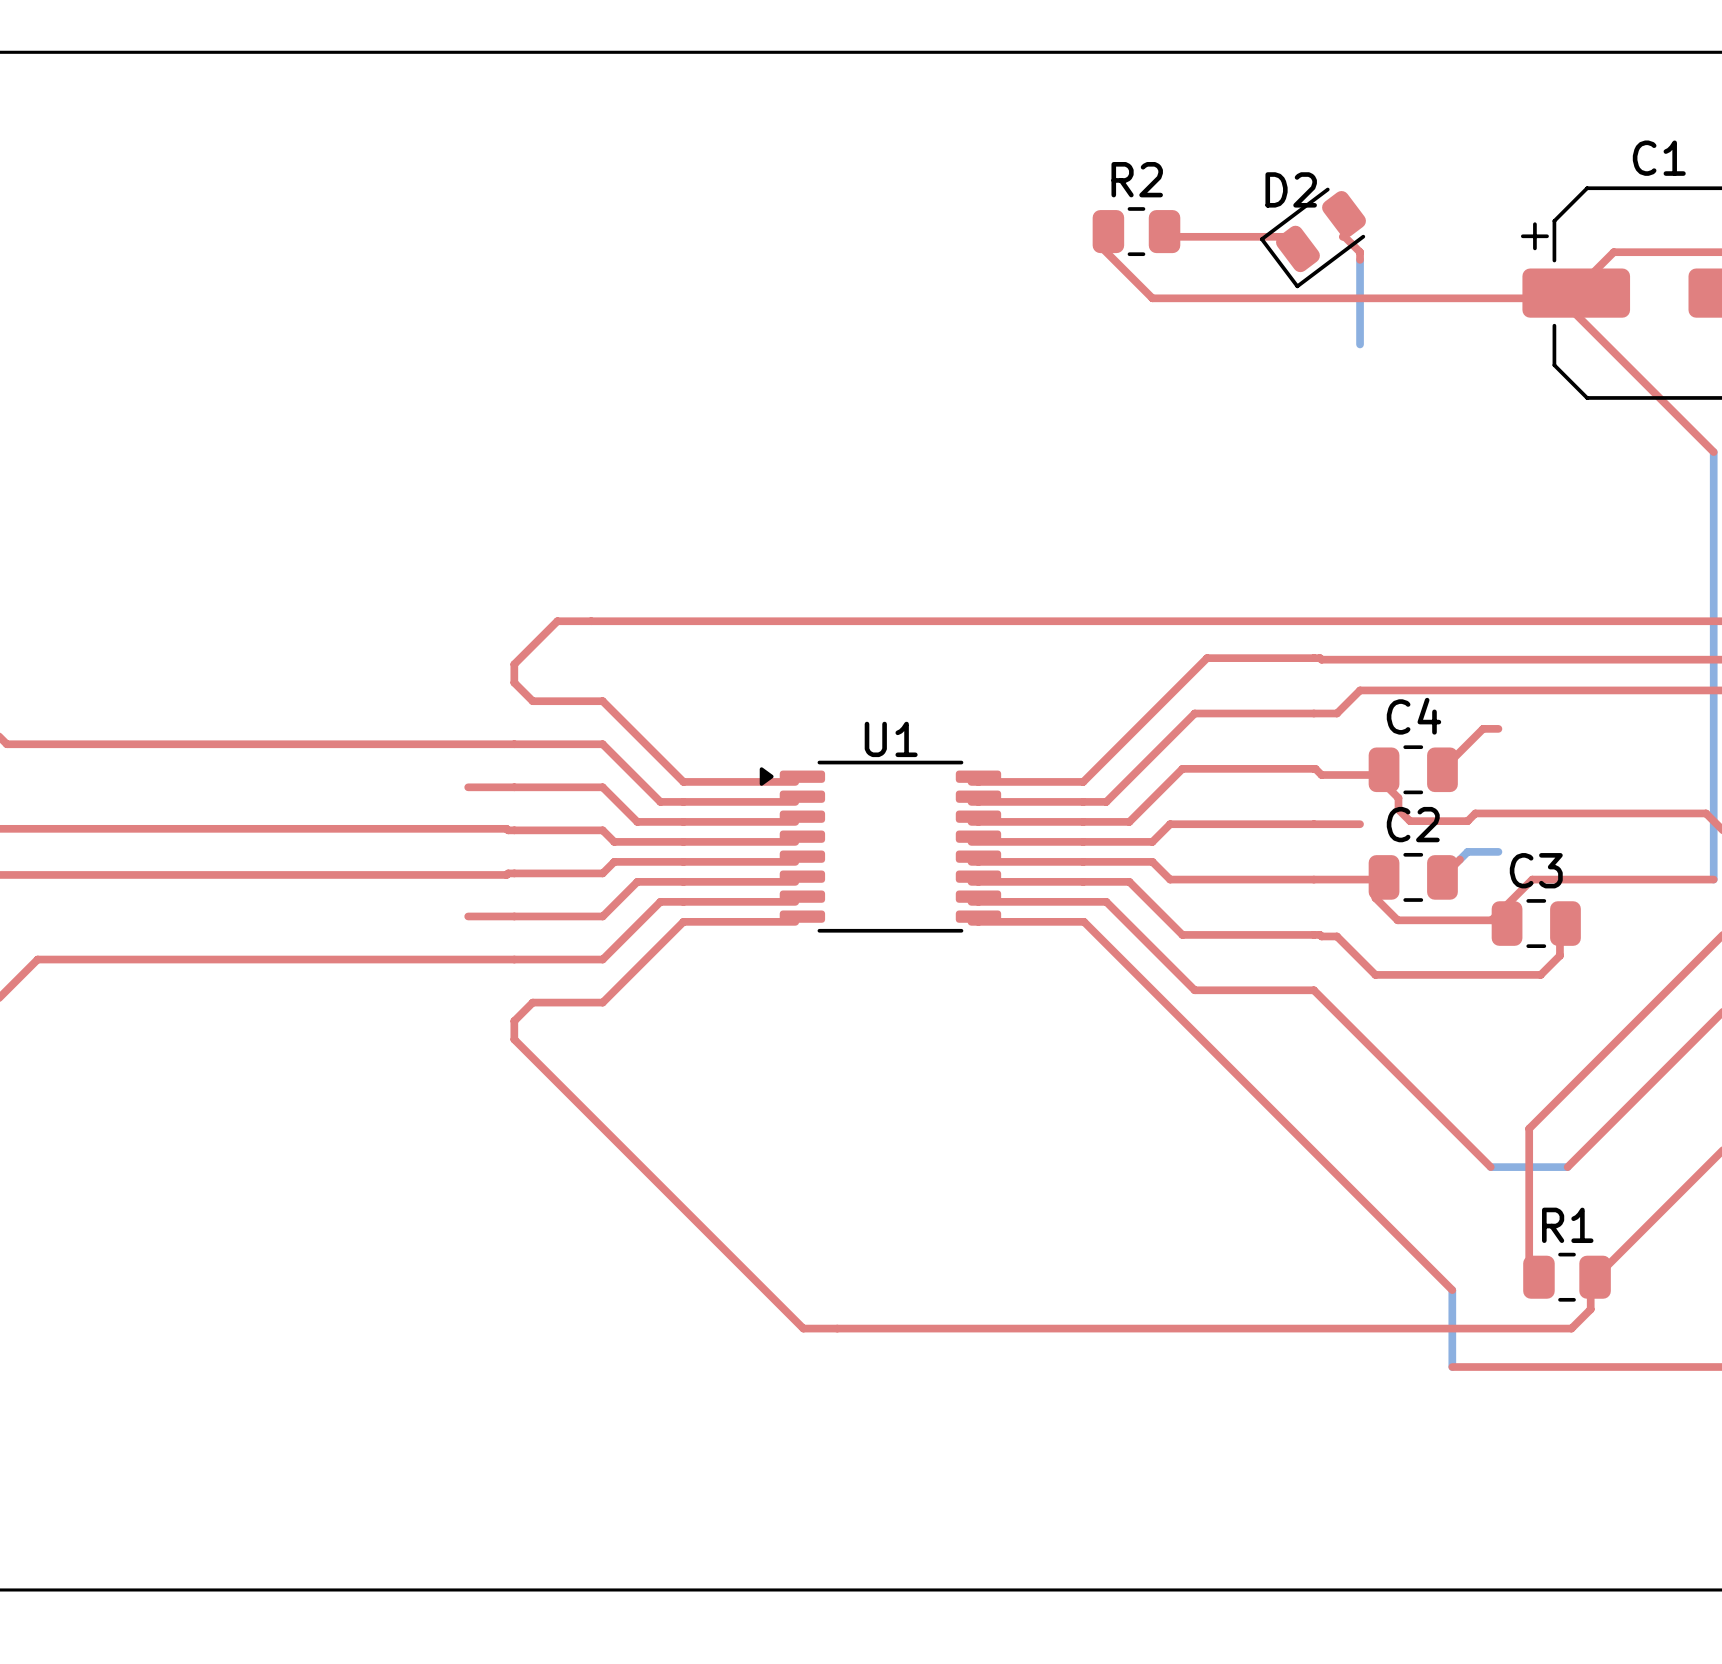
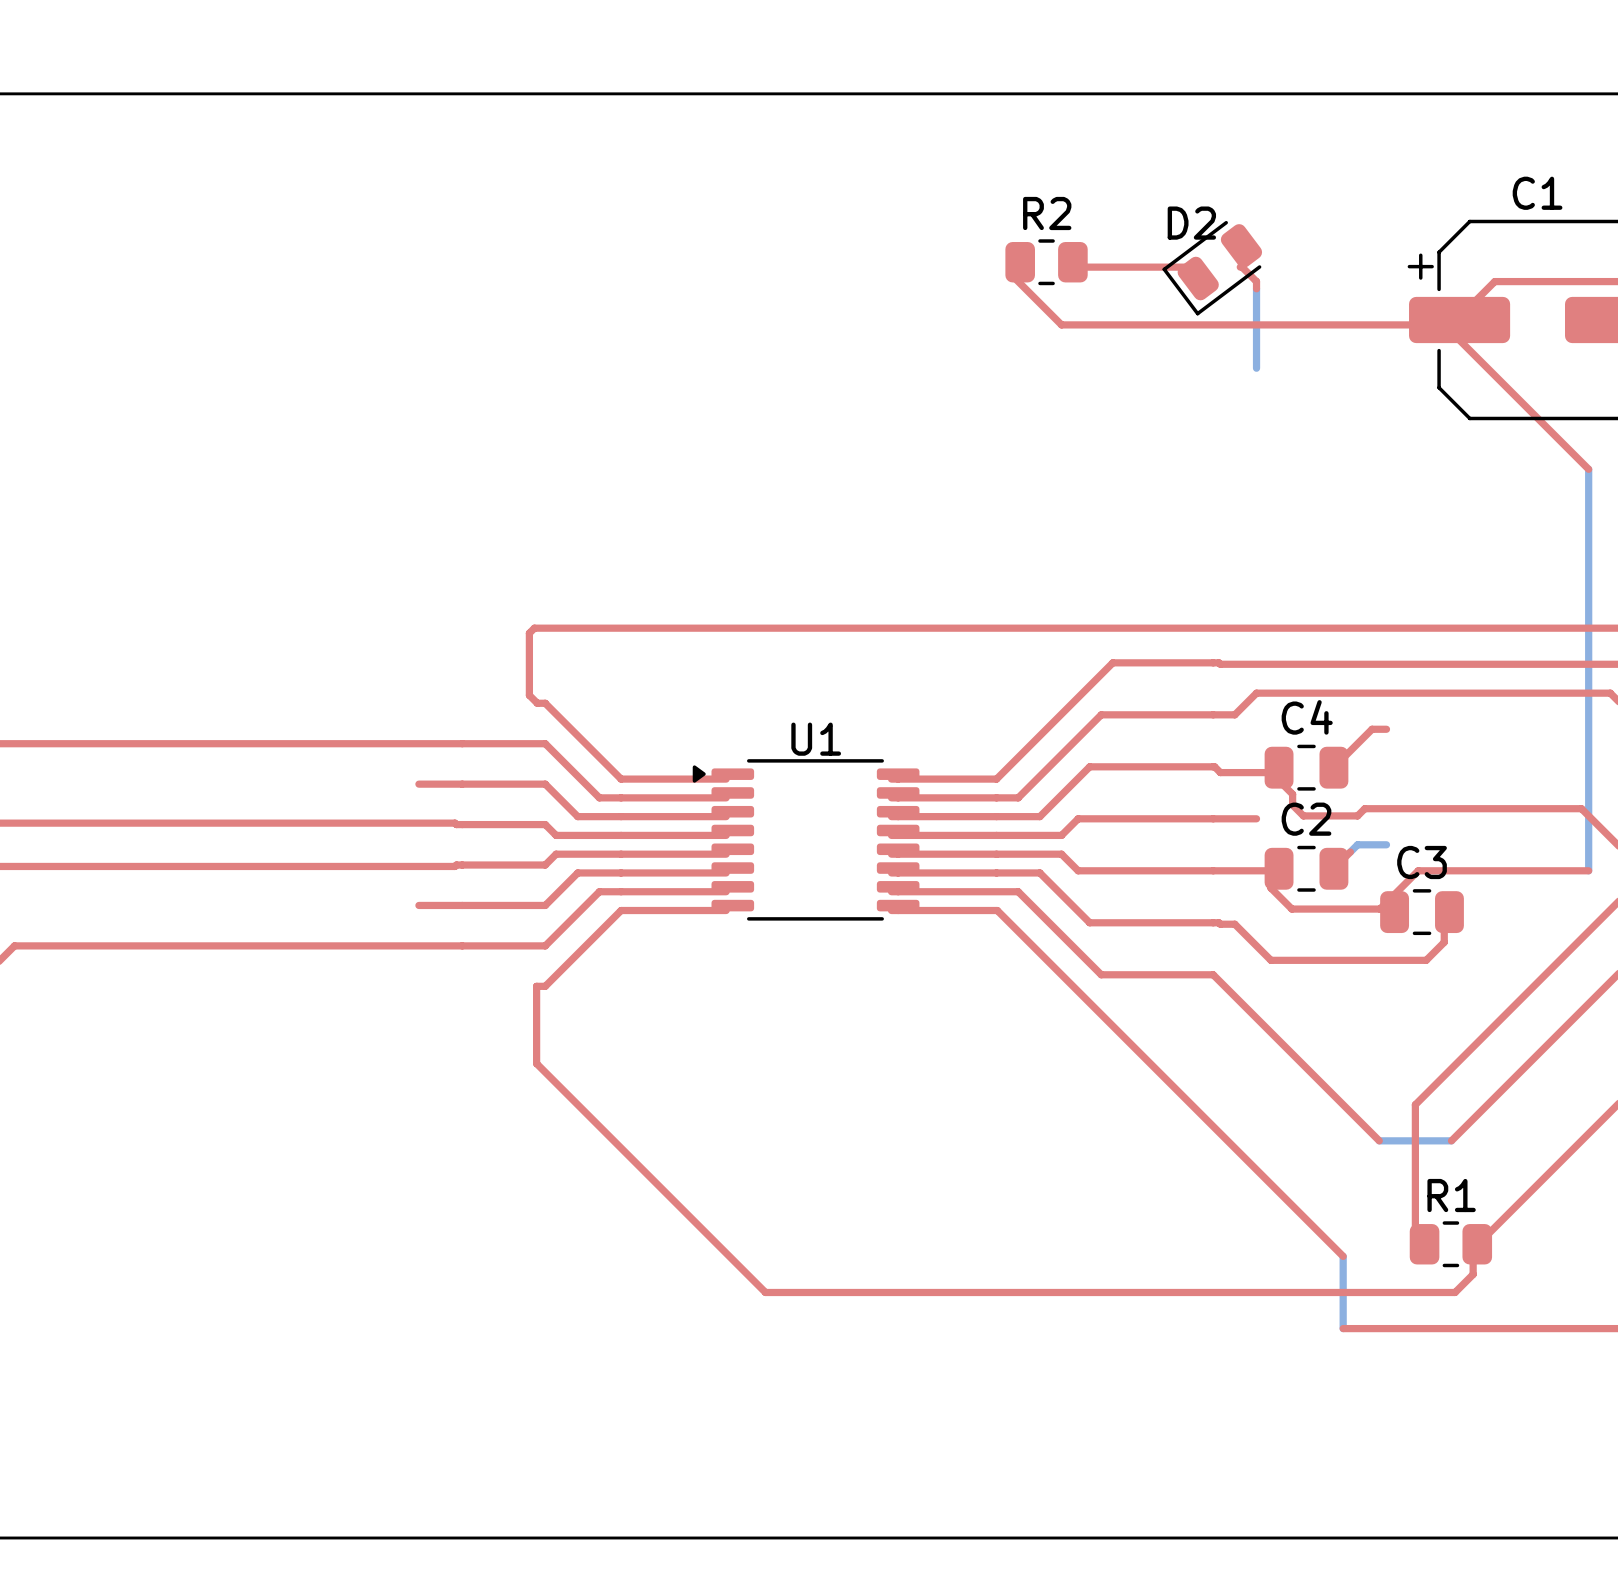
top track: (591, 621) (557, 621) (514, 664) (514, 682) (532, 701) (594, 701) -> (534, 628) (529, 633) (529, 695) (537, 703)
top track: (593, 1002) (532, 1002) (514, 1021) (514, 1039) (803, 1328) (837, 1328) -> (536, 986) (536, 1063) (765, 1292)

